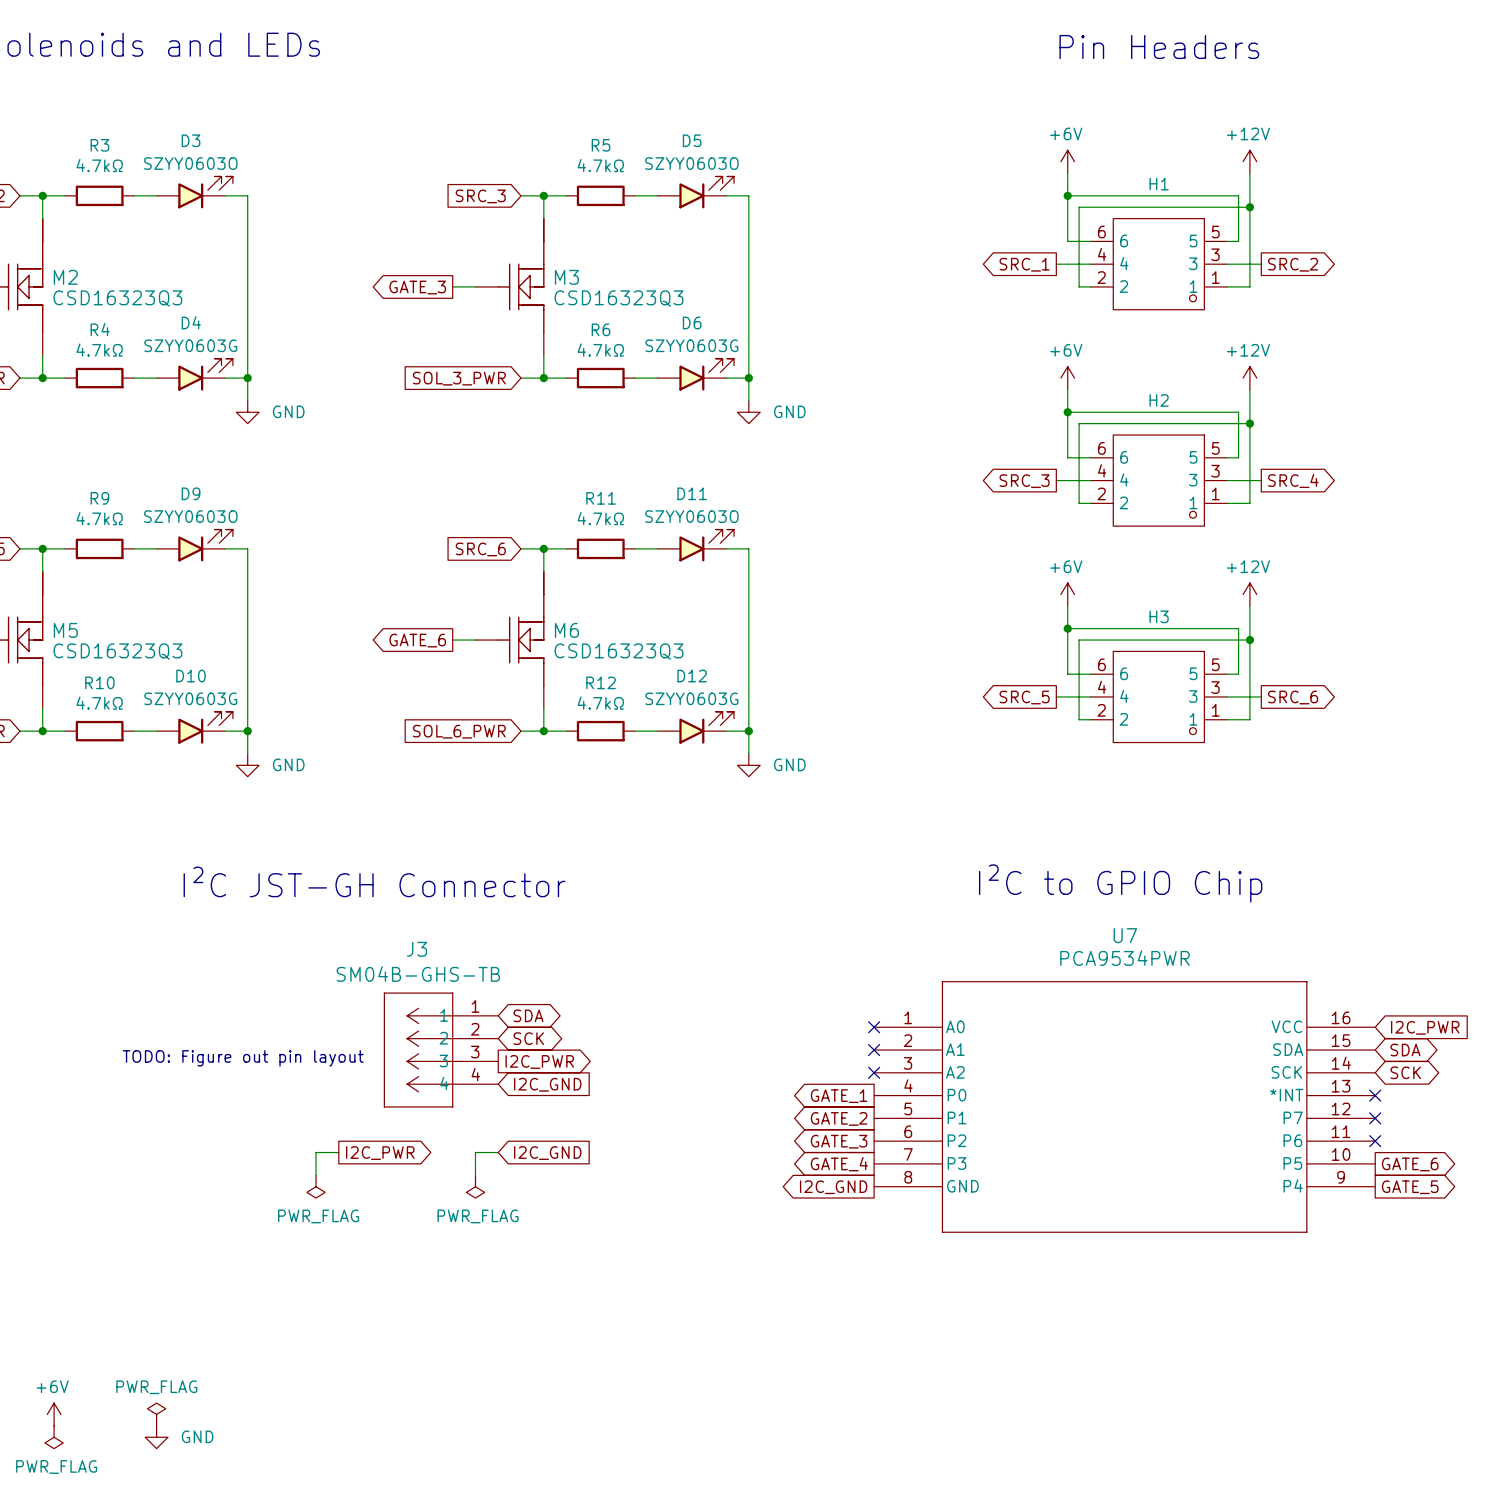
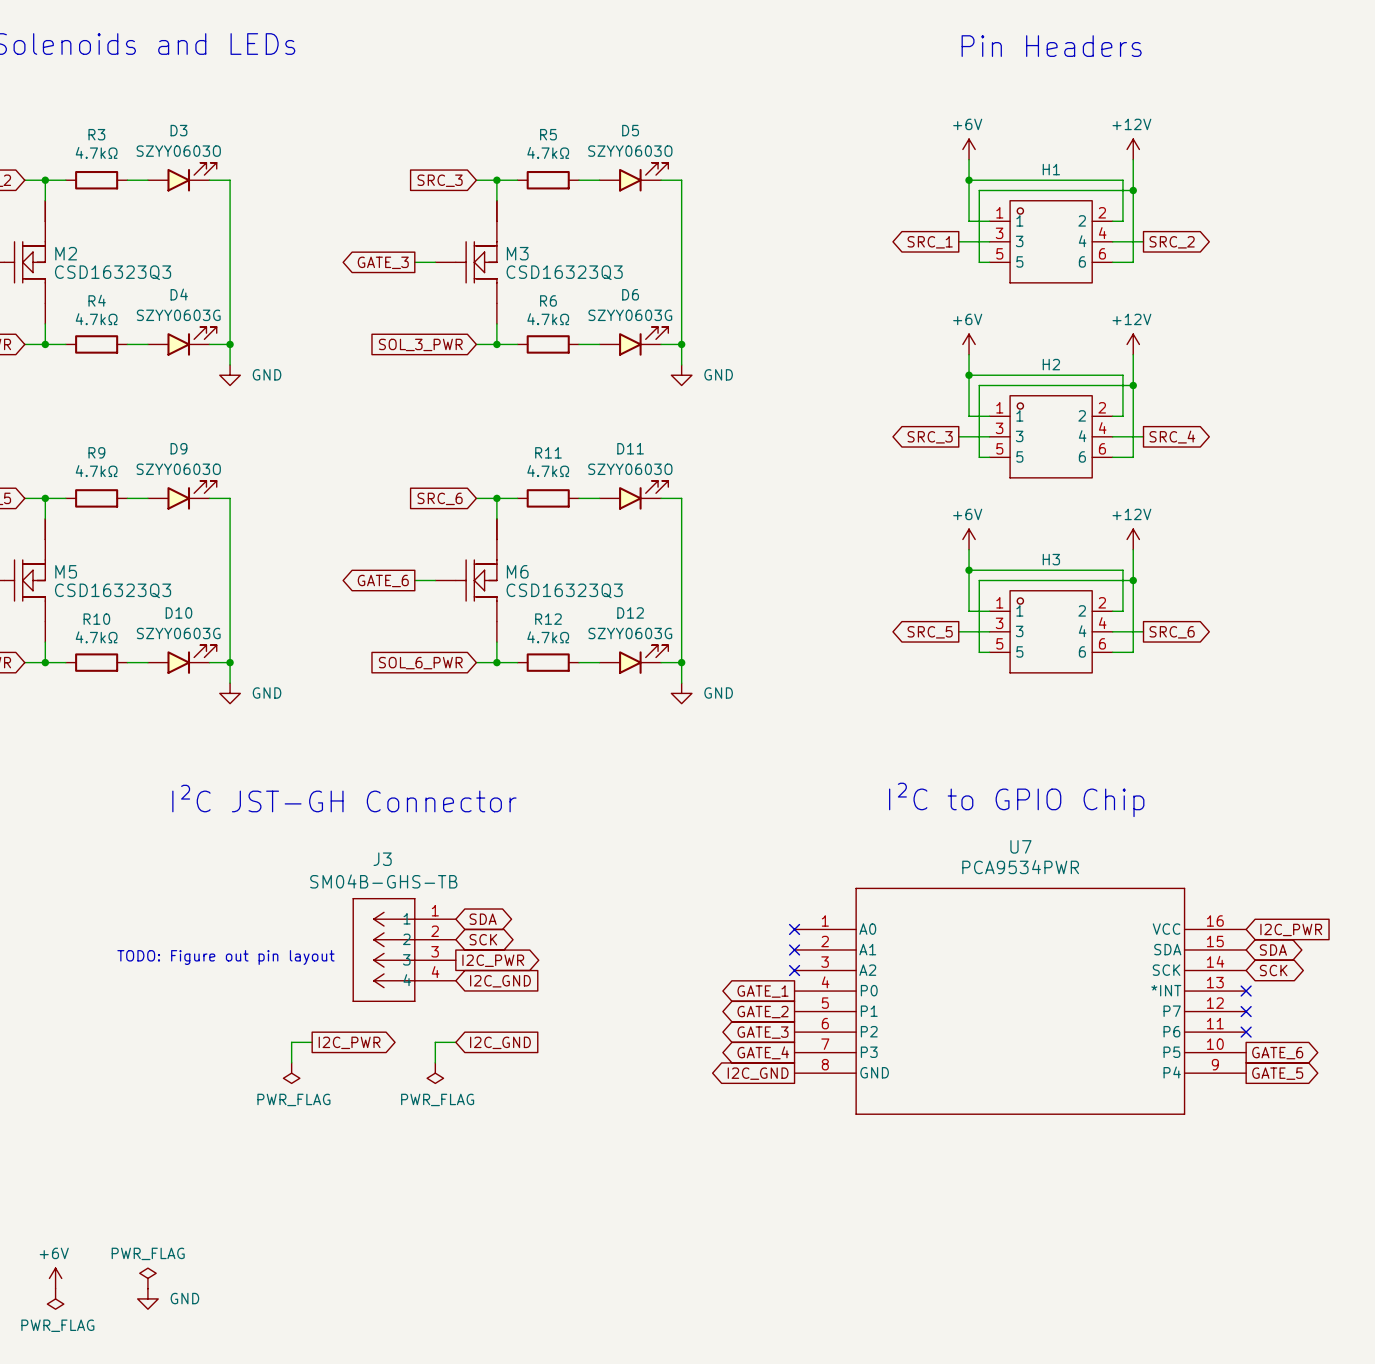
H1 rotation: 0° (1158, 264) -> 180° (1051, 241)
H2 rotation: 0° (1158, 480) -> 180° (1051, 436)
H3 rotation: 0° (1158, 696) -> 180° (1051, 631)

